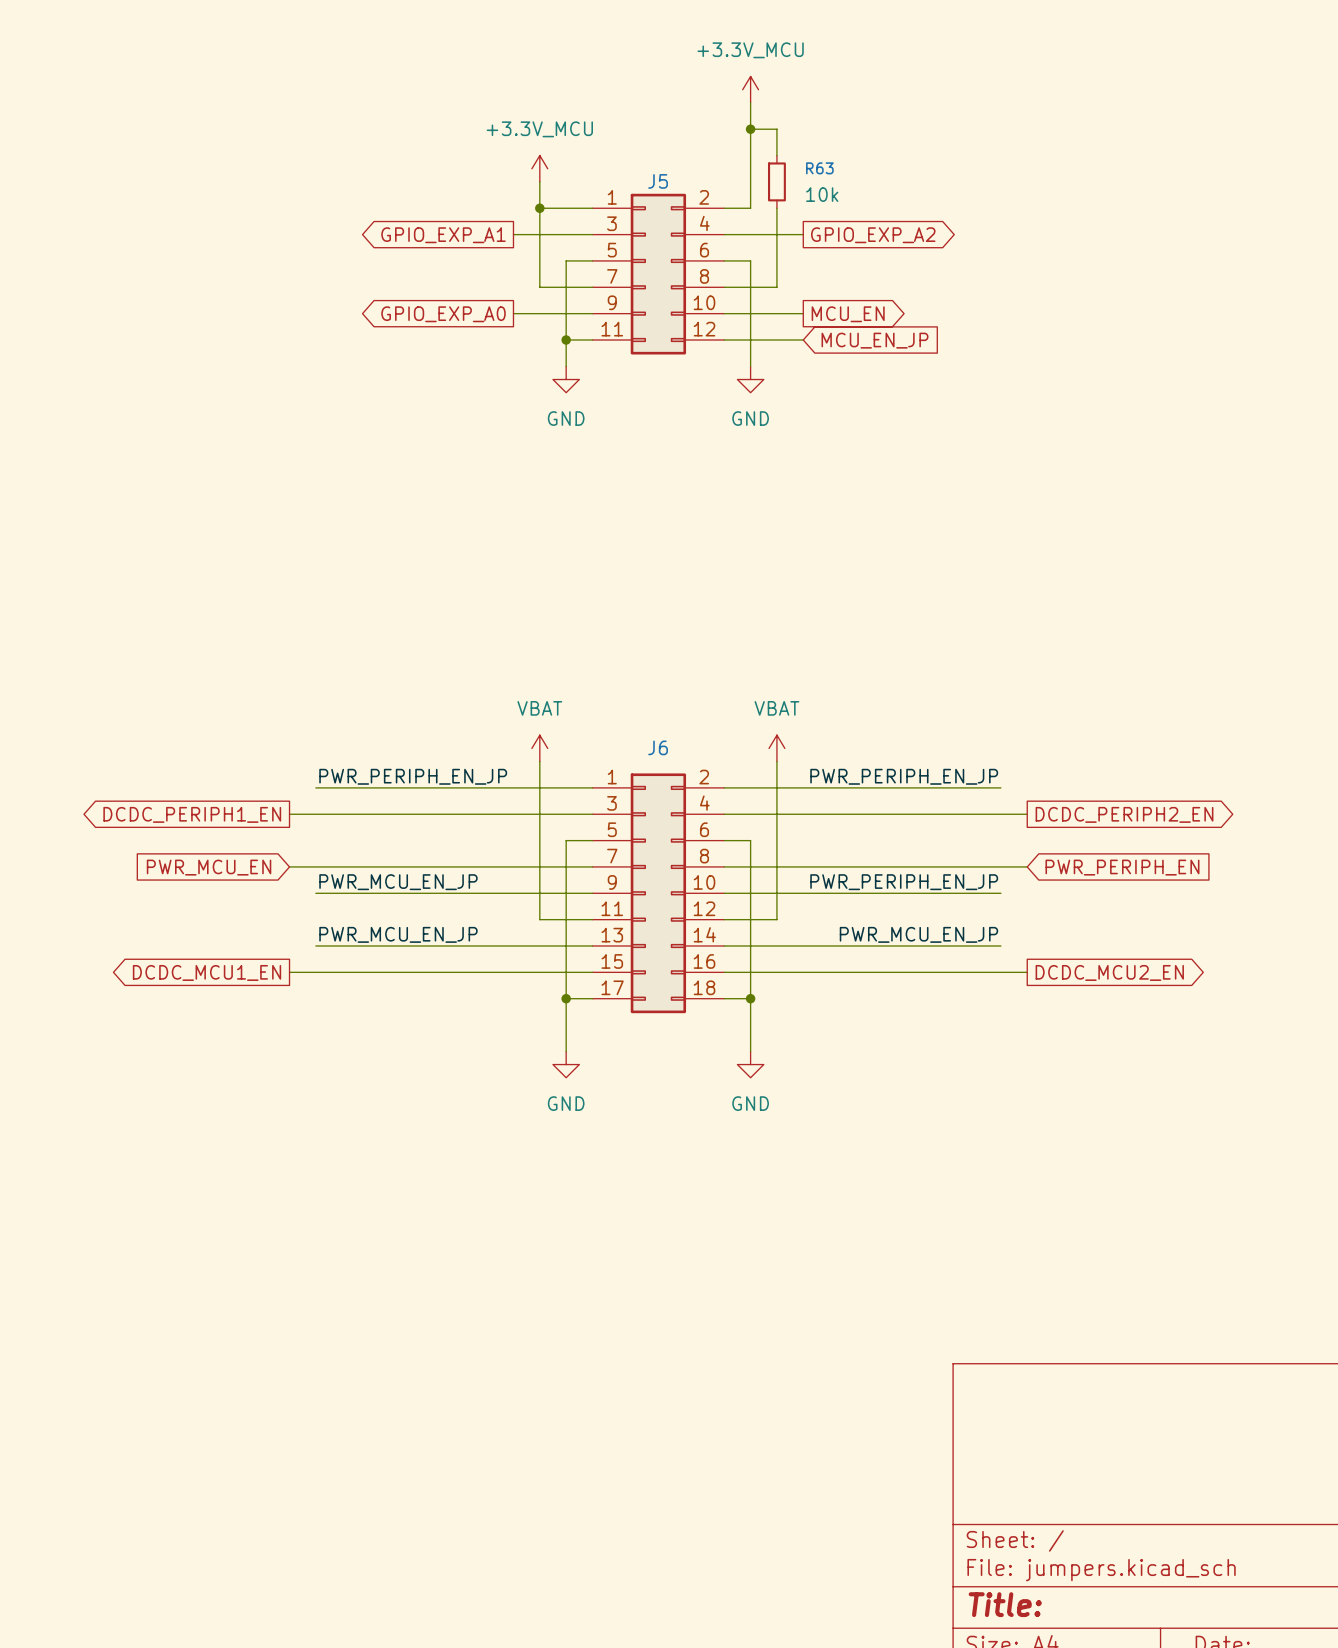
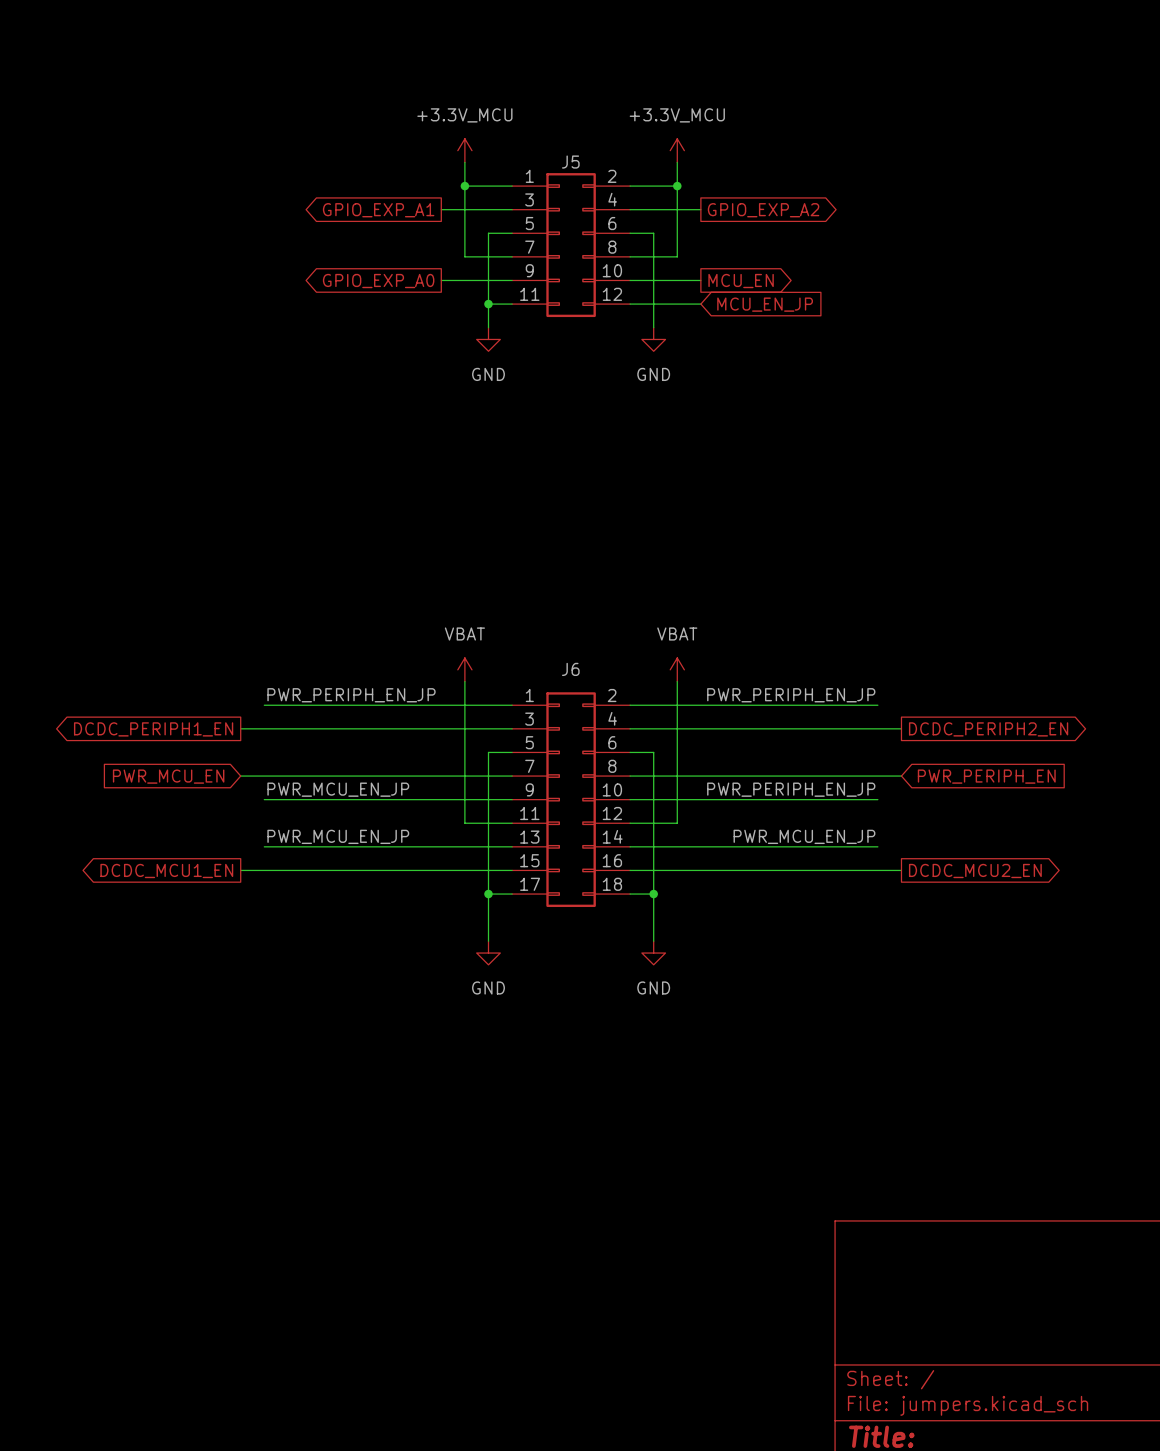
power symbol position: +3.3V_MCU (750, 89) -> +3.3V_MCU (677, 150)
wire: (750, 102) (750, 208) -> (677, 162) (677, 186) (653, 186)
wire: (750, 129) (776, 129) (776, 155) -> none
junction: (750, 129) -> none
R63: 10k (776, 181) -> none
junction: none -> (677, 186)

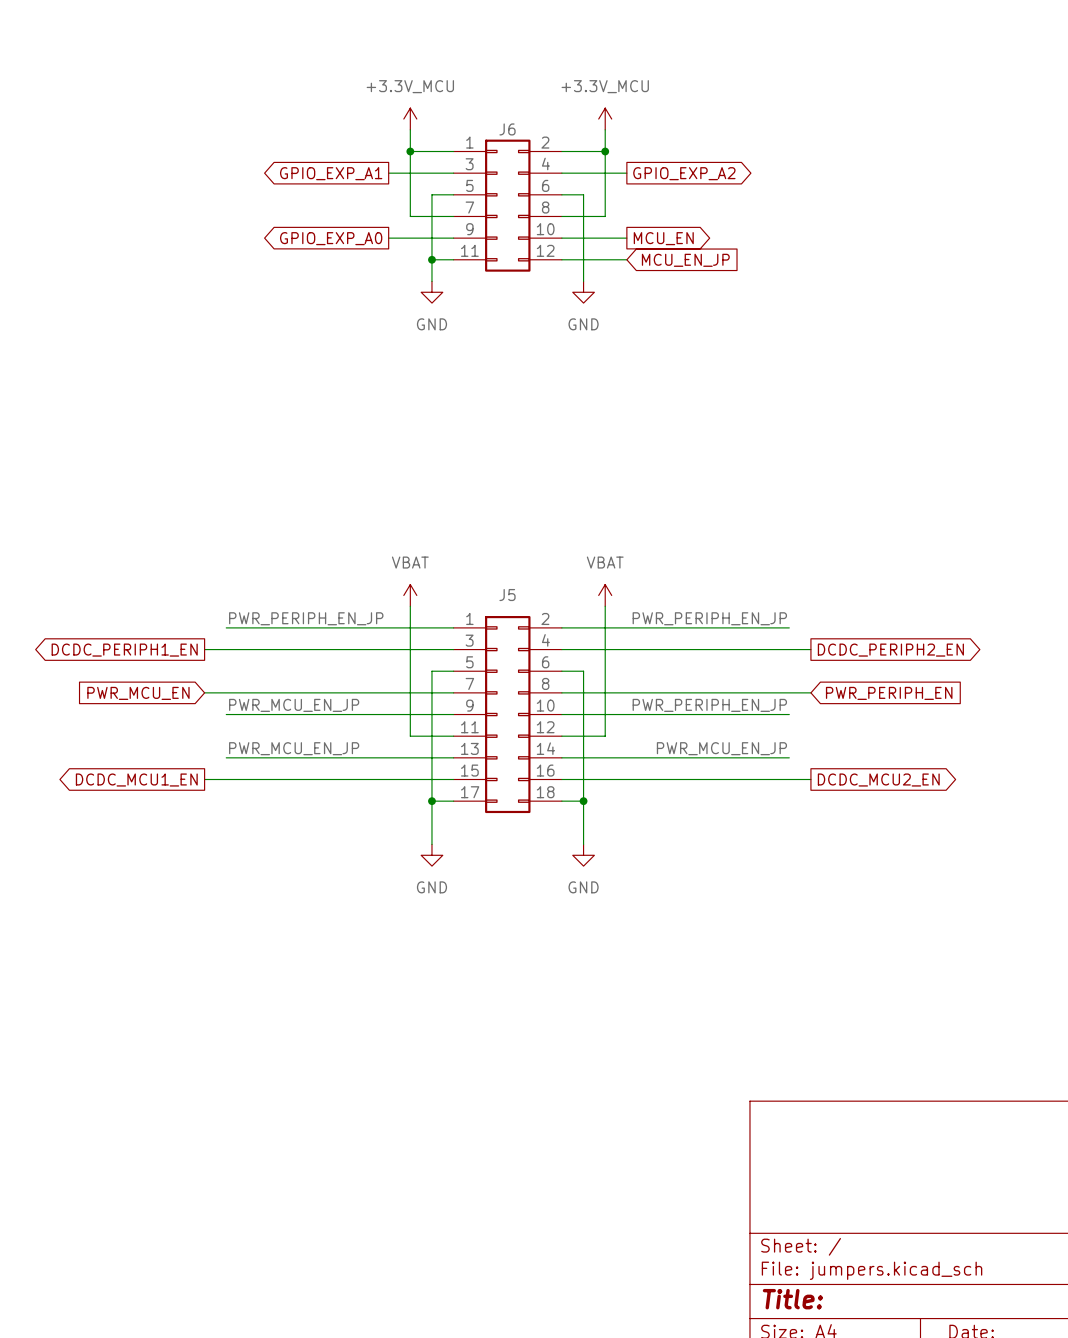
J5 name: J5 (570, 162) -> J6 (507, 129)
J6 name: J6 (570, 669) -> J5 (507, 595)

